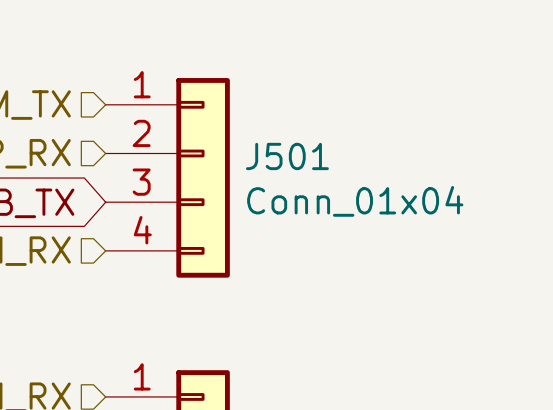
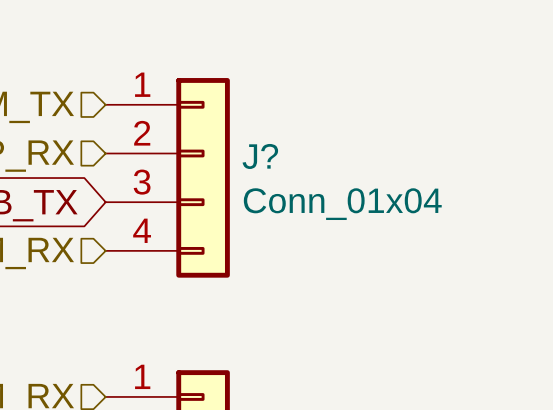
J501 name: J501 (287, 156) -> J? (260, 156)

